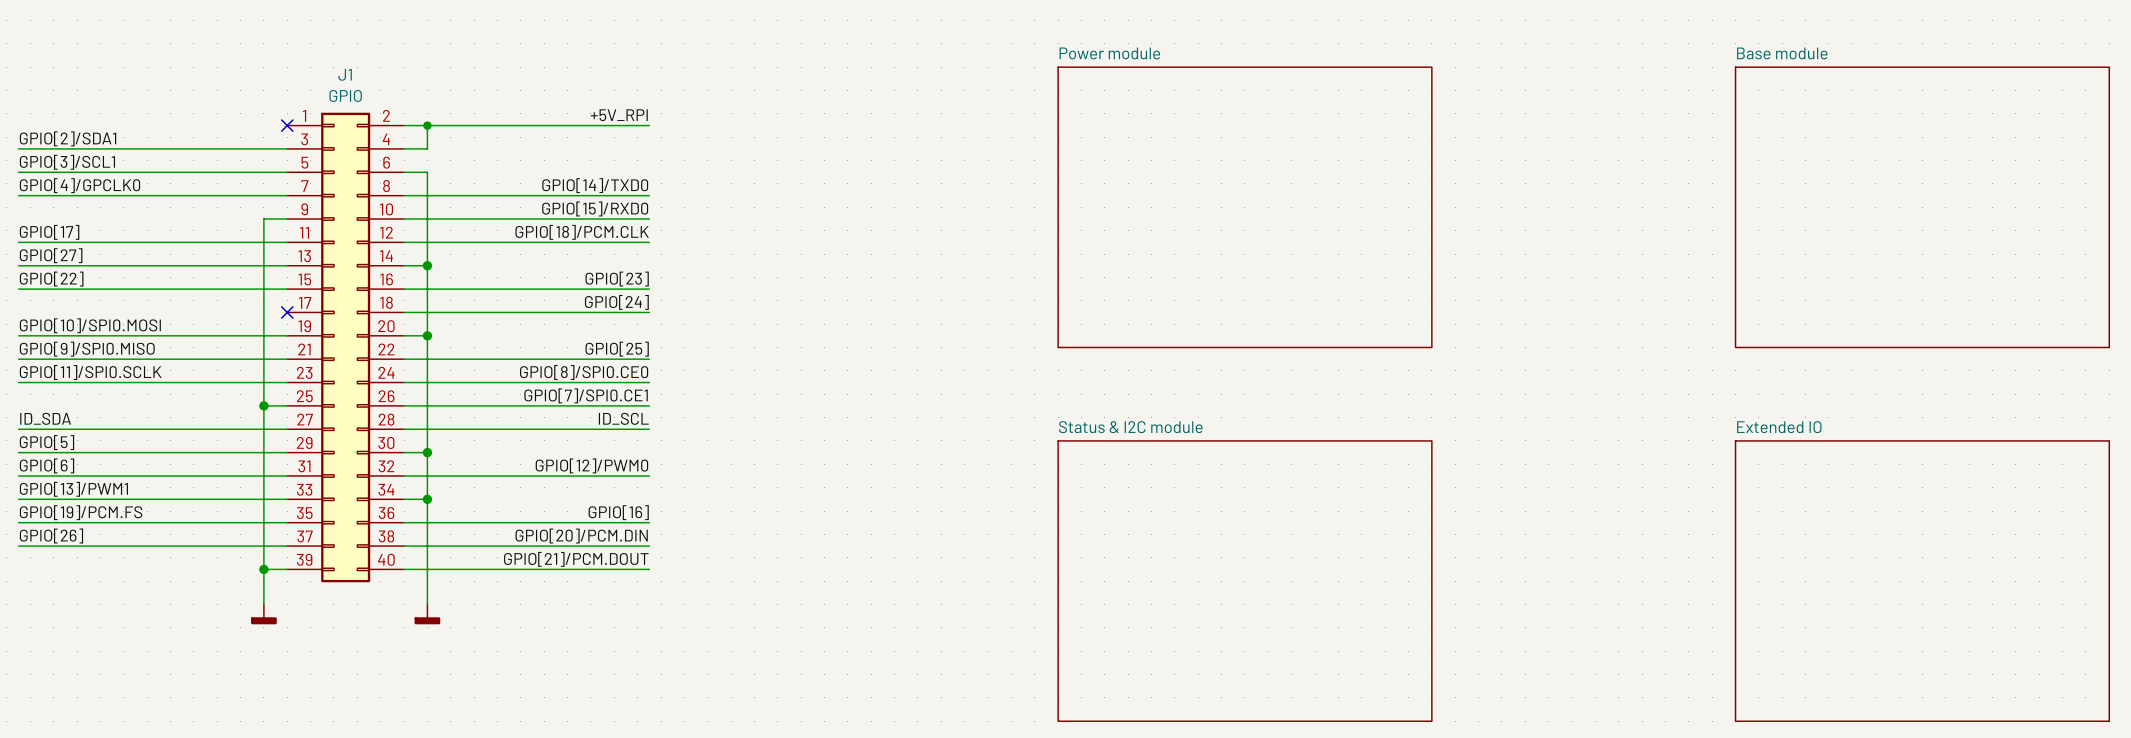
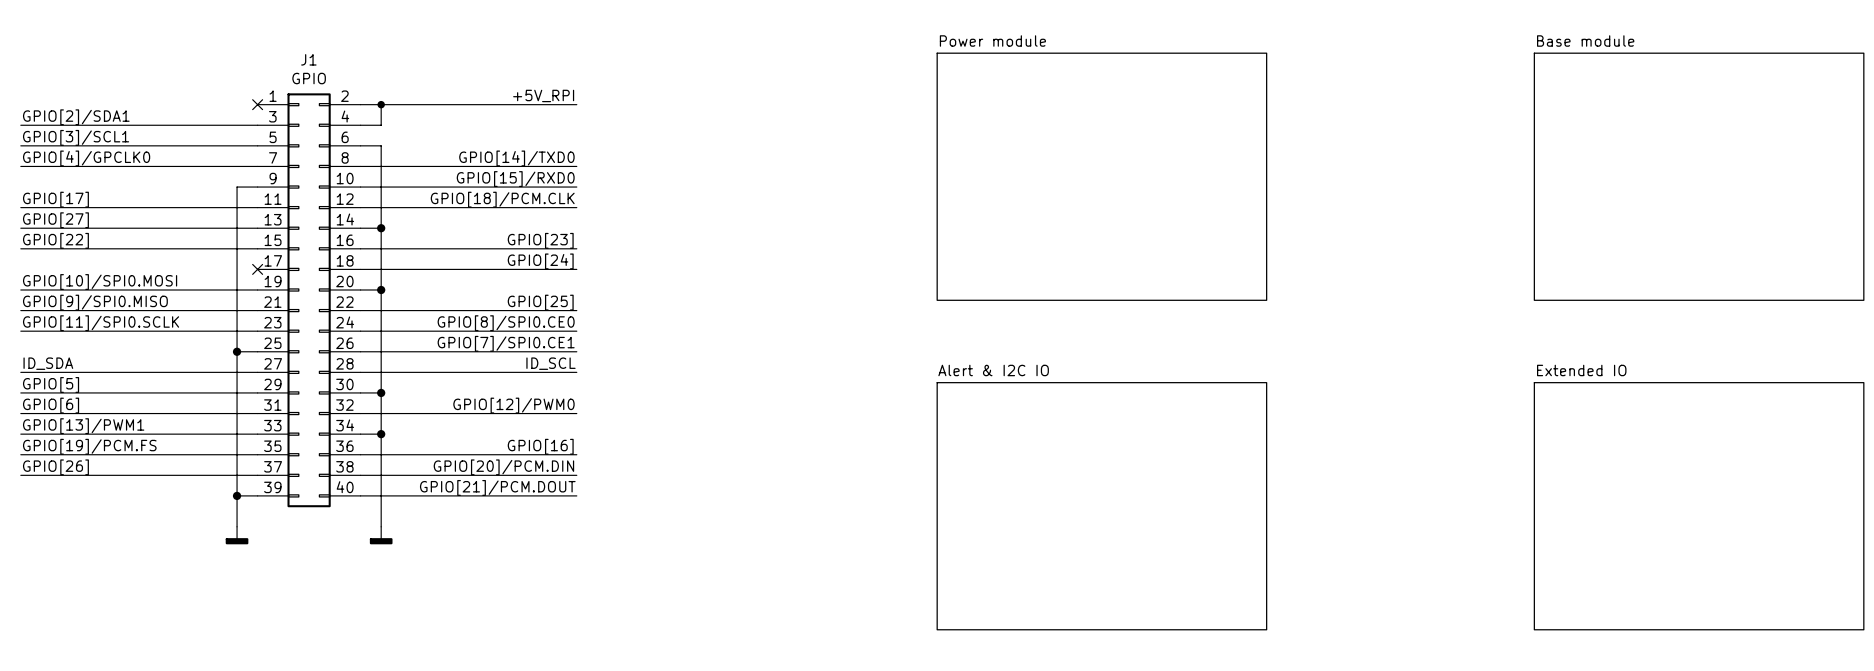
sheet Status & I2C module name: Status & I2C module (1130, 427) -> Alert & I2C IO (993, 370)

